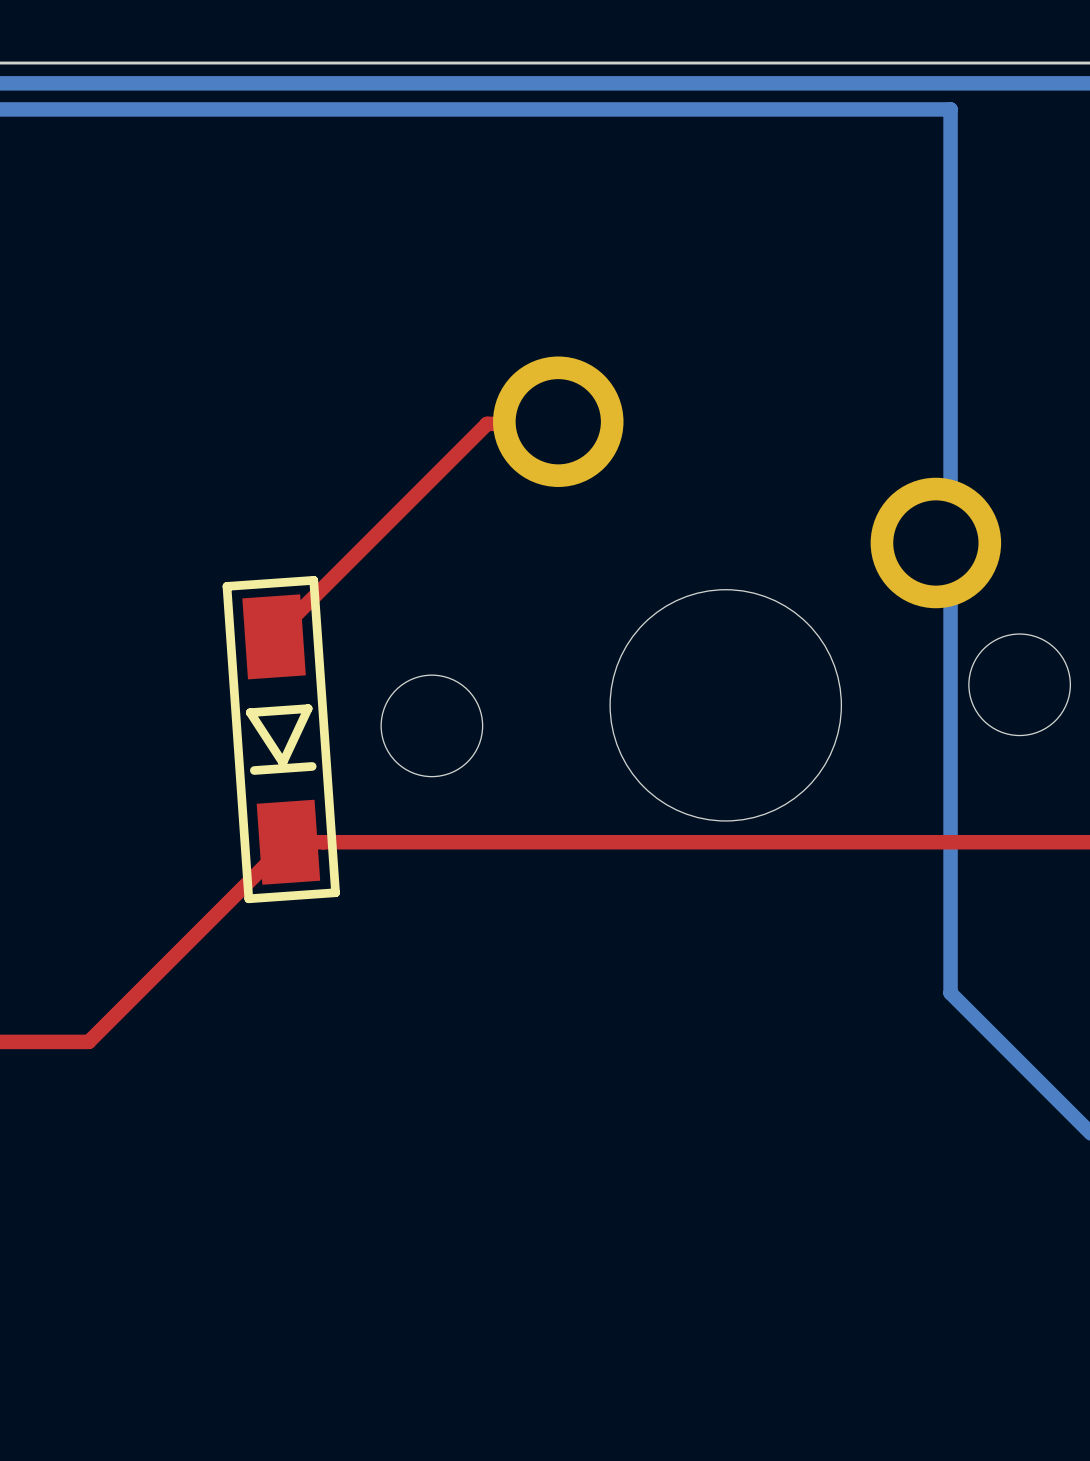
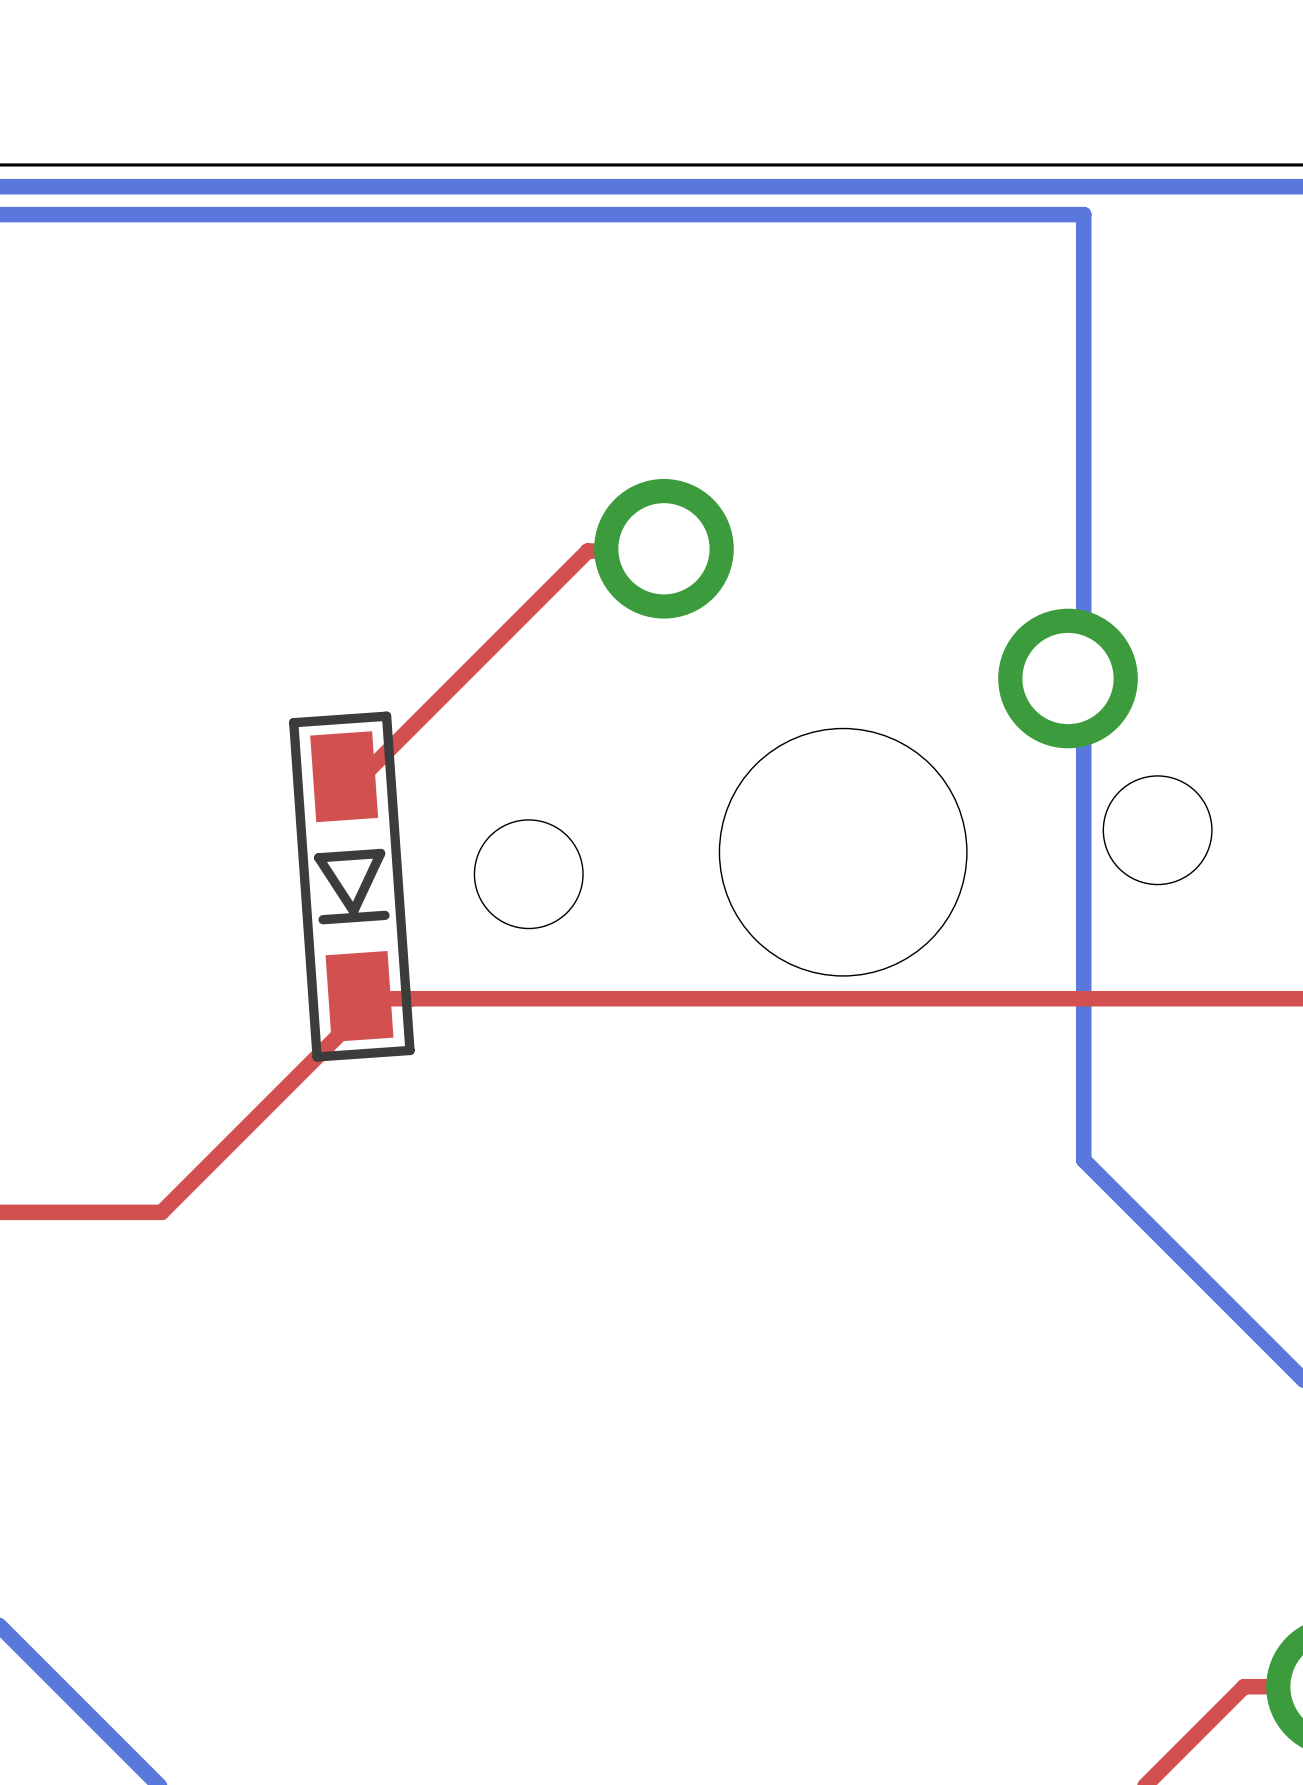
part position: (281, 739) -> (351, 886)

